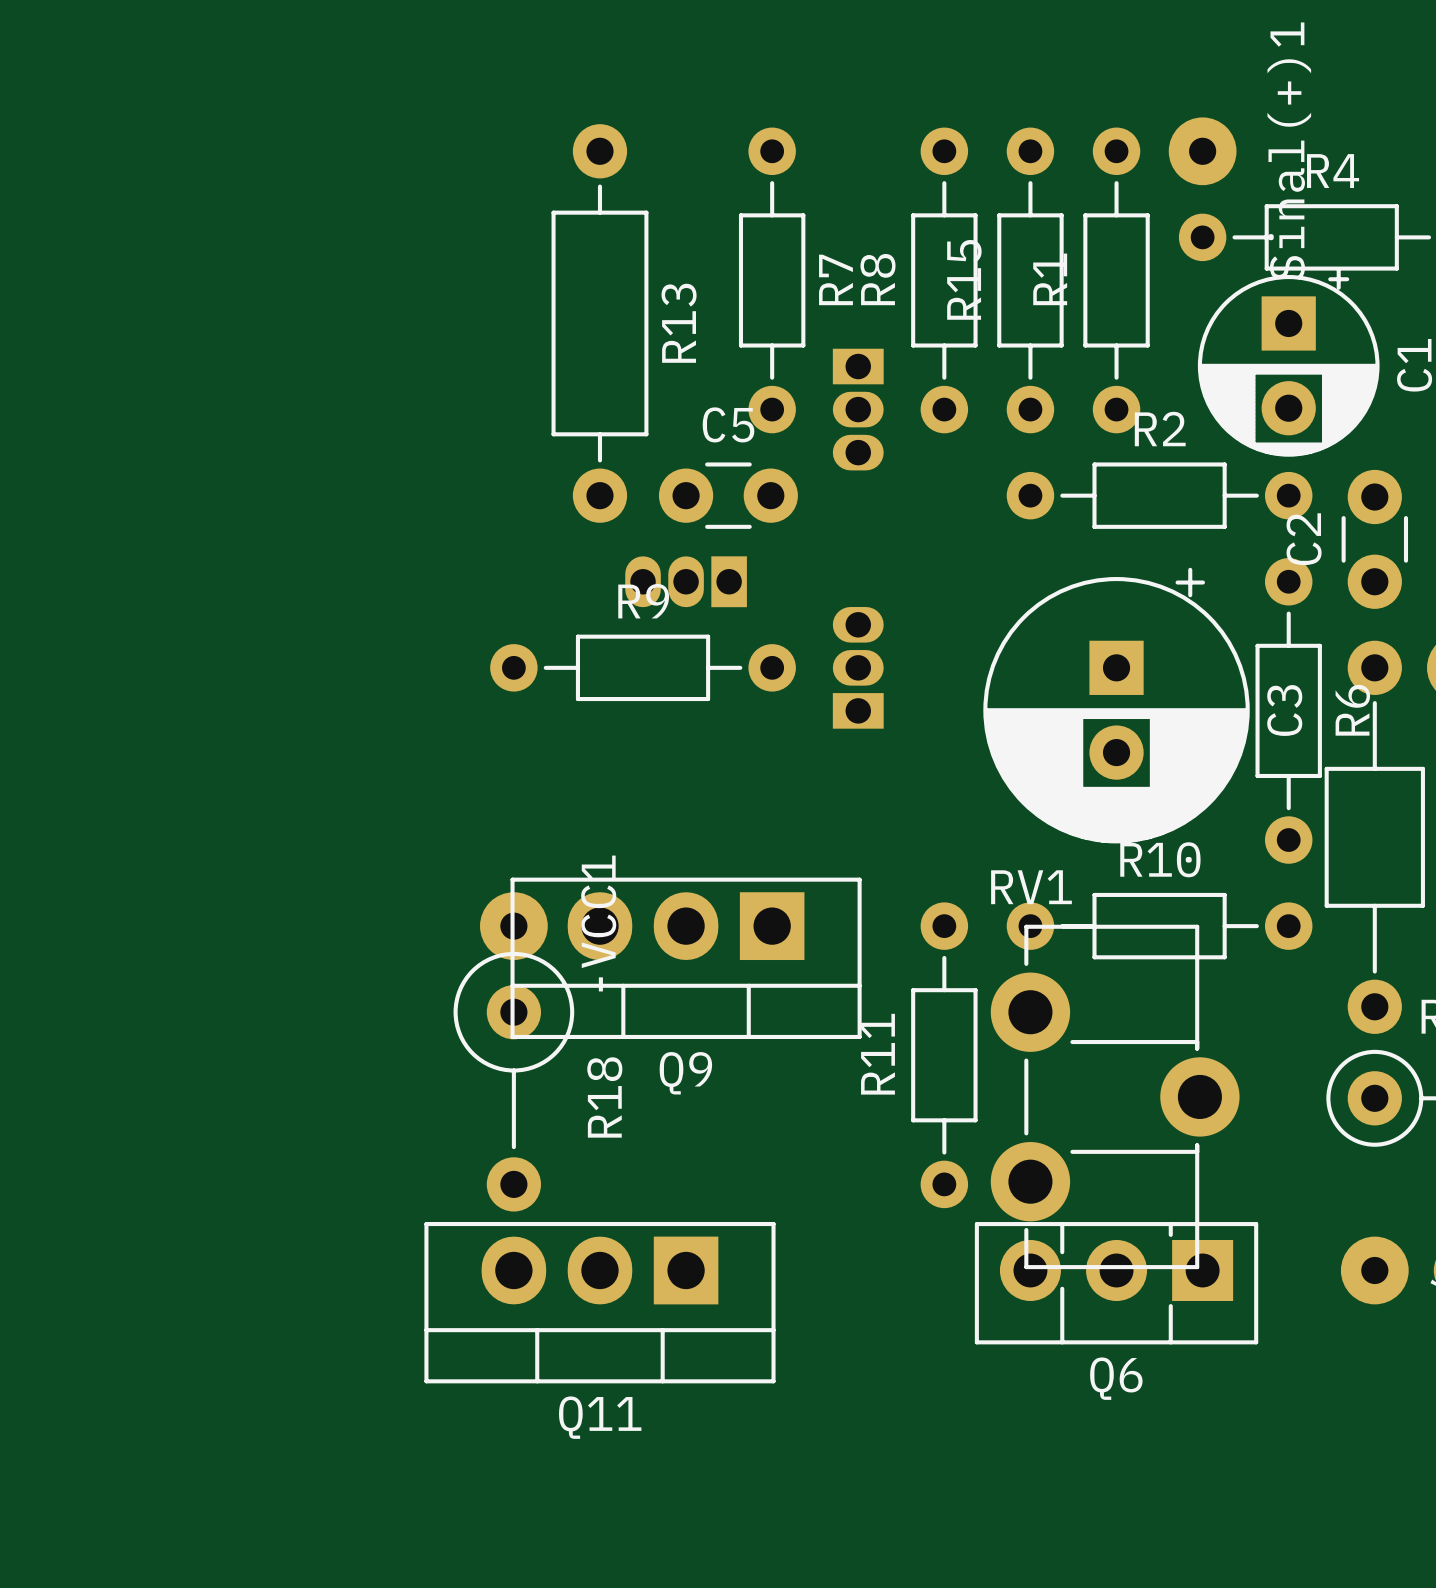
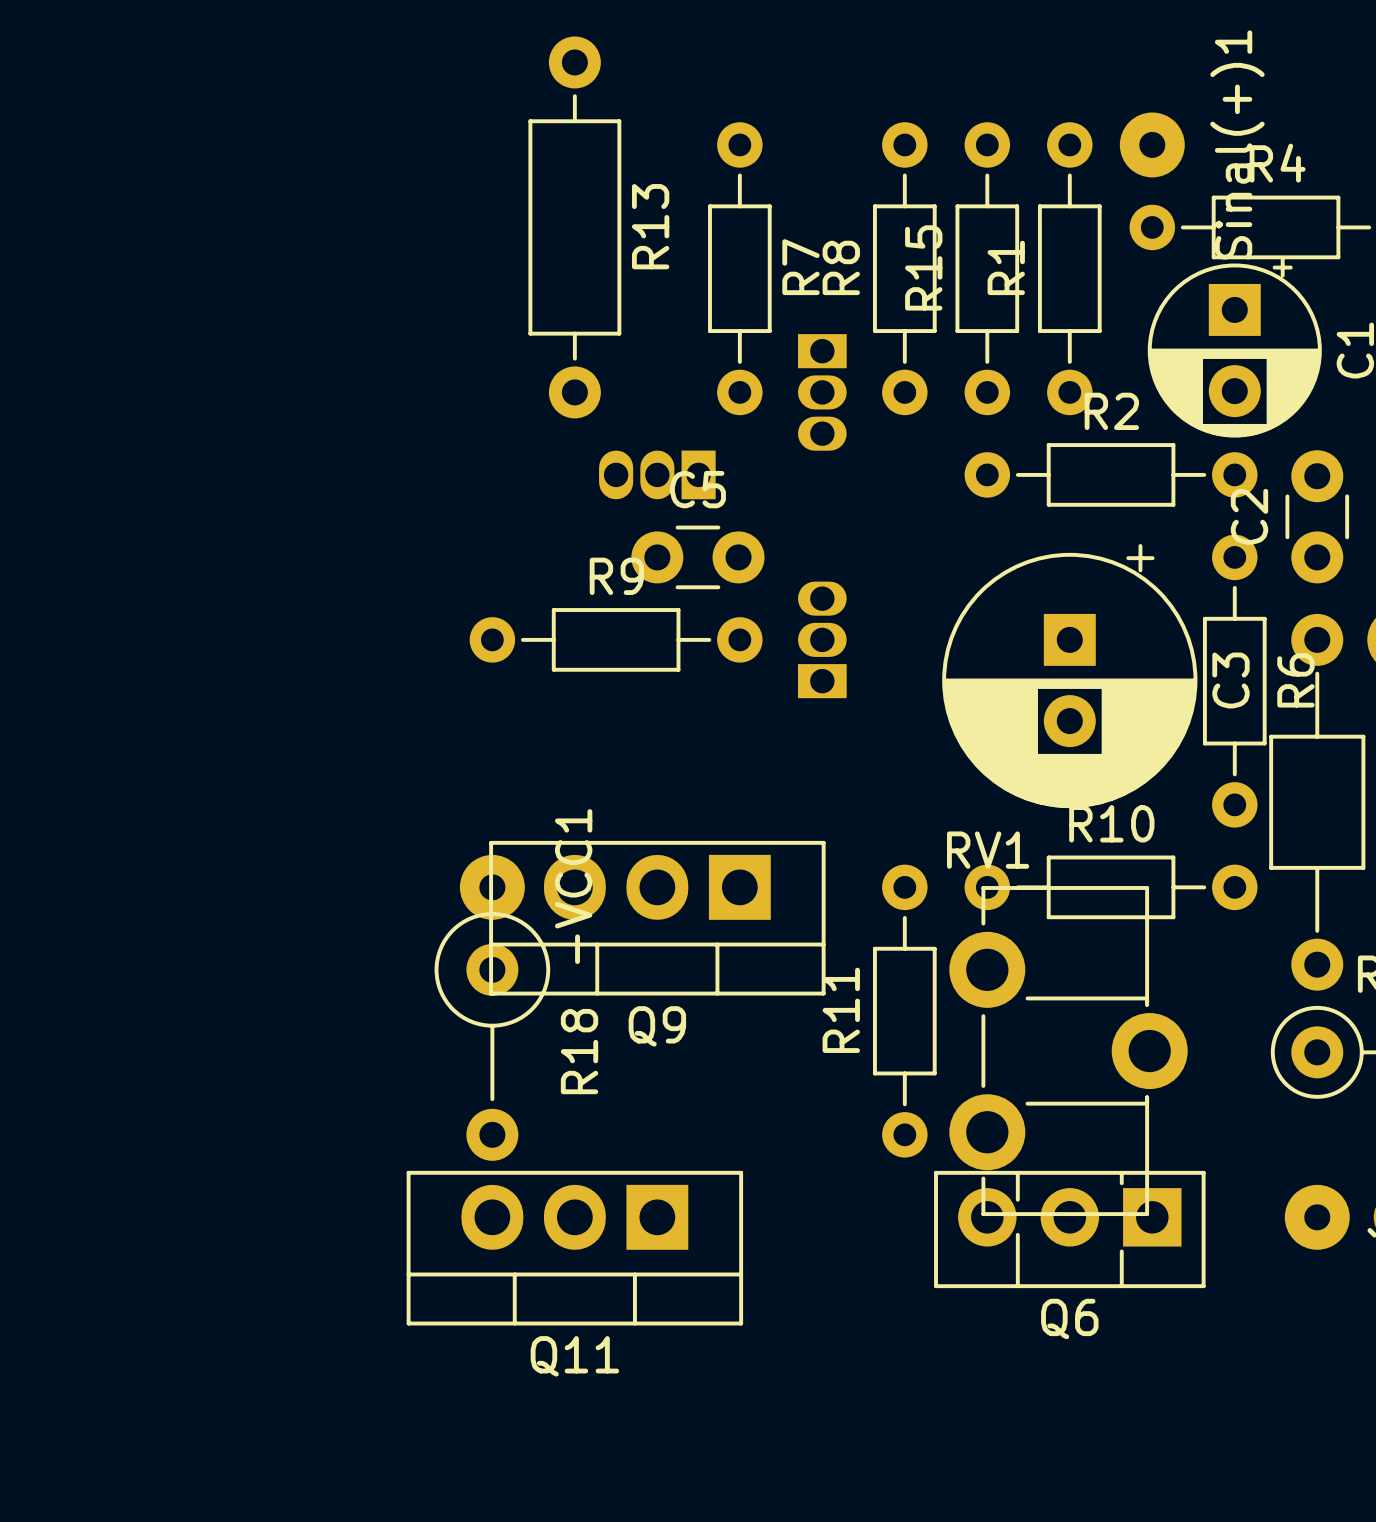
R13 position: (599, 323) -> (574, 227)
C5 position: (728, 495) -> (697, 557)
part position: (686, 581) -> (657, 474)

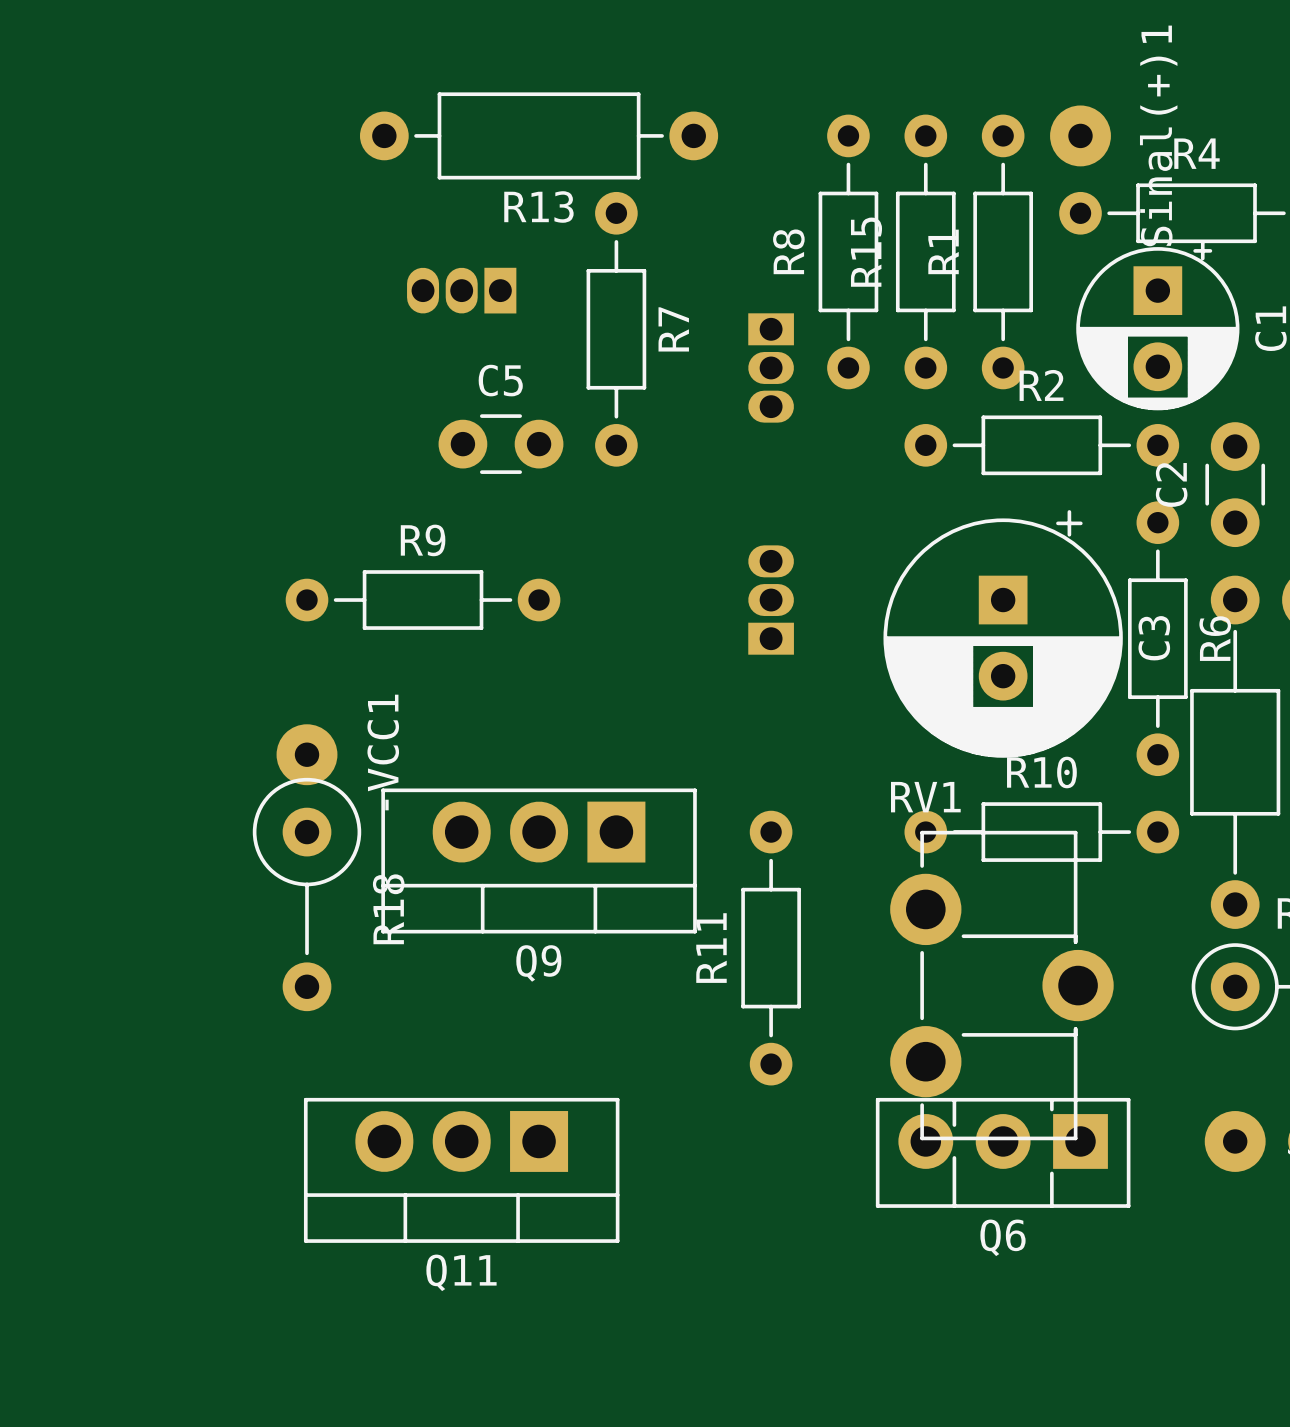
R13 rotation: 0° (574, 227) -> 90° clockwise (539, 135)
R7 position: (739, 268) -> (616, 329)
part position: (657, 474) -> (461, 290)
C5 position: (697, 557) -> (500, 444)
R9 position: (616, 639) -> (423, 600)
-VCC1 position: (492, 887) -> (307, 754)
Q9 position: (657, 918) -> (539, 860)
R11 position: (904, 1011) -> (771, 948)
R18 position: (492, 1036) -> (307, 894)
Q11 position: (574, 1248) -> (461, 1170)

